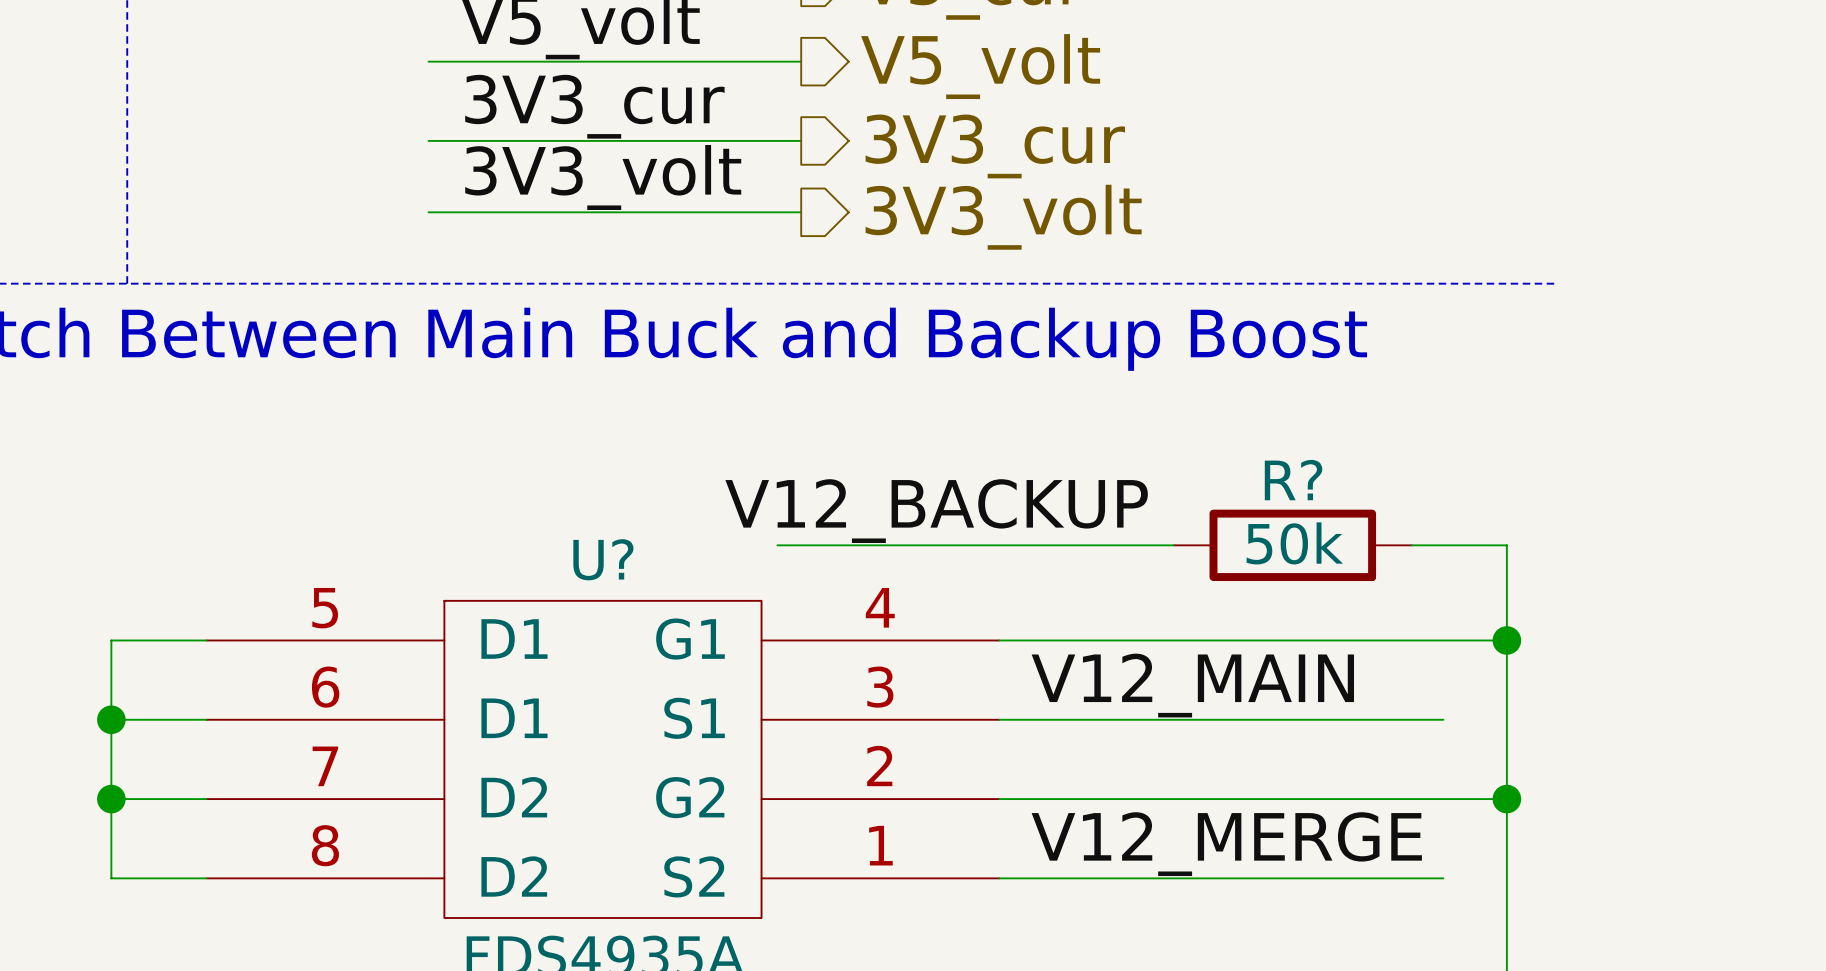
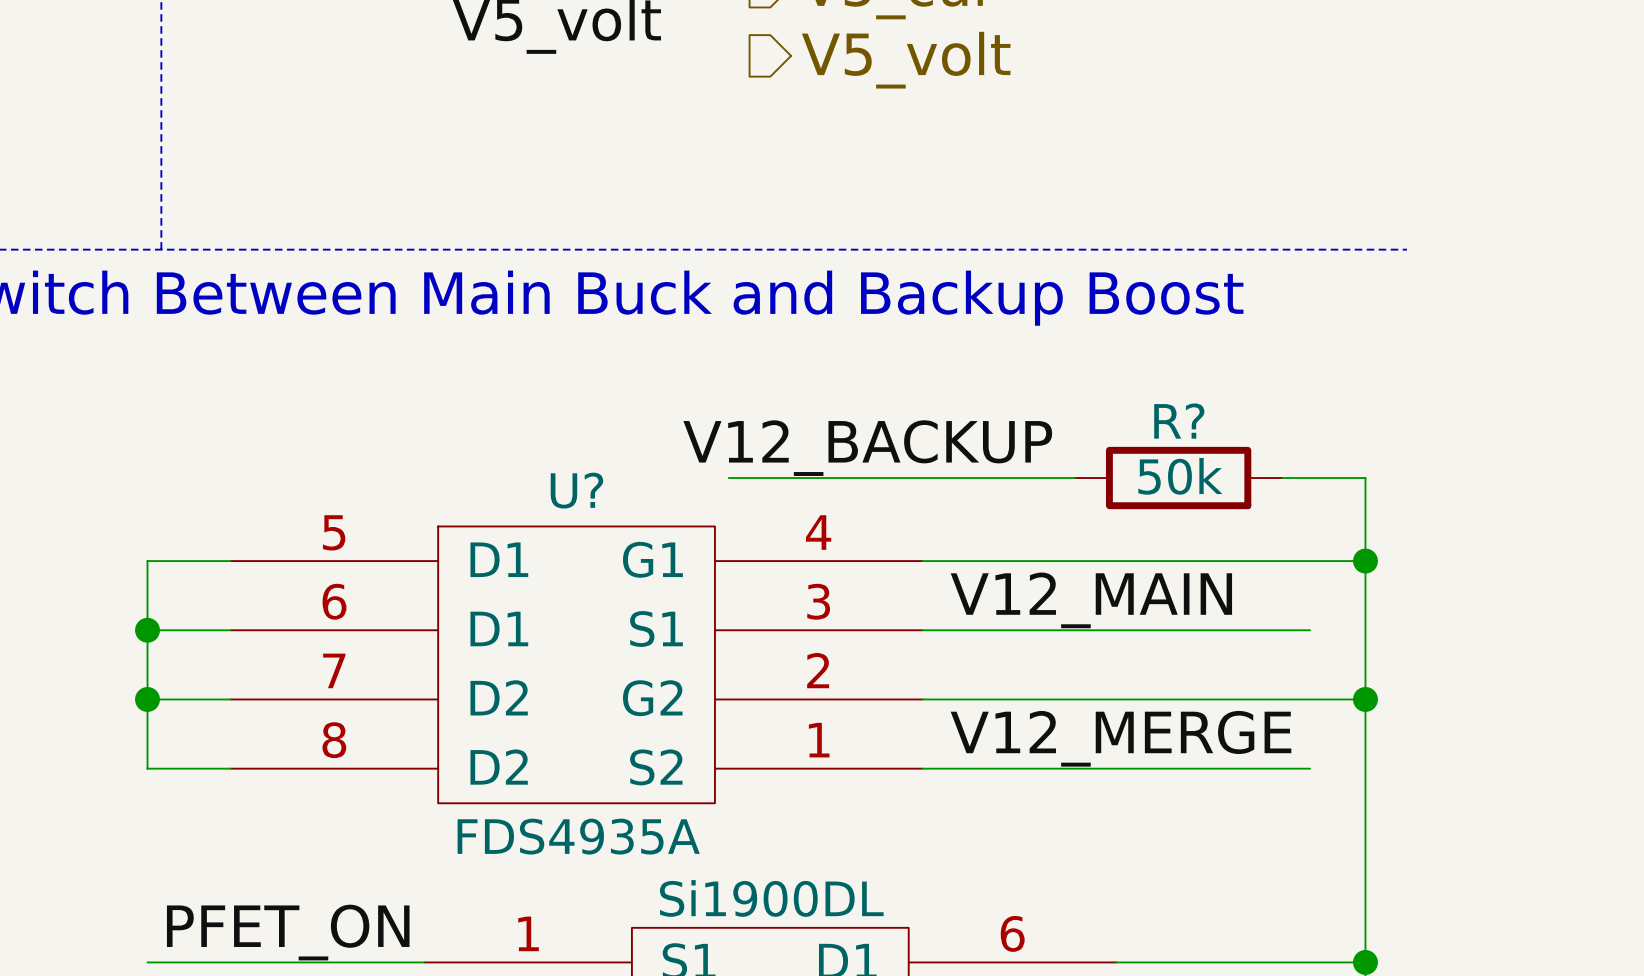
wire: (428, 61) (801, 61) -> none
label: 3V3_cur (594, 106) -> none
wire: (428, 140) (801, 140) -> none
hierarchical label: 3V3_cur (995, 146) -> none
label: 3V3_volt (603, 177) -> none
wire: (428, 212) (801, 212) -> none
hierarchical label: 3V3_volt (1003, 217) -> none

